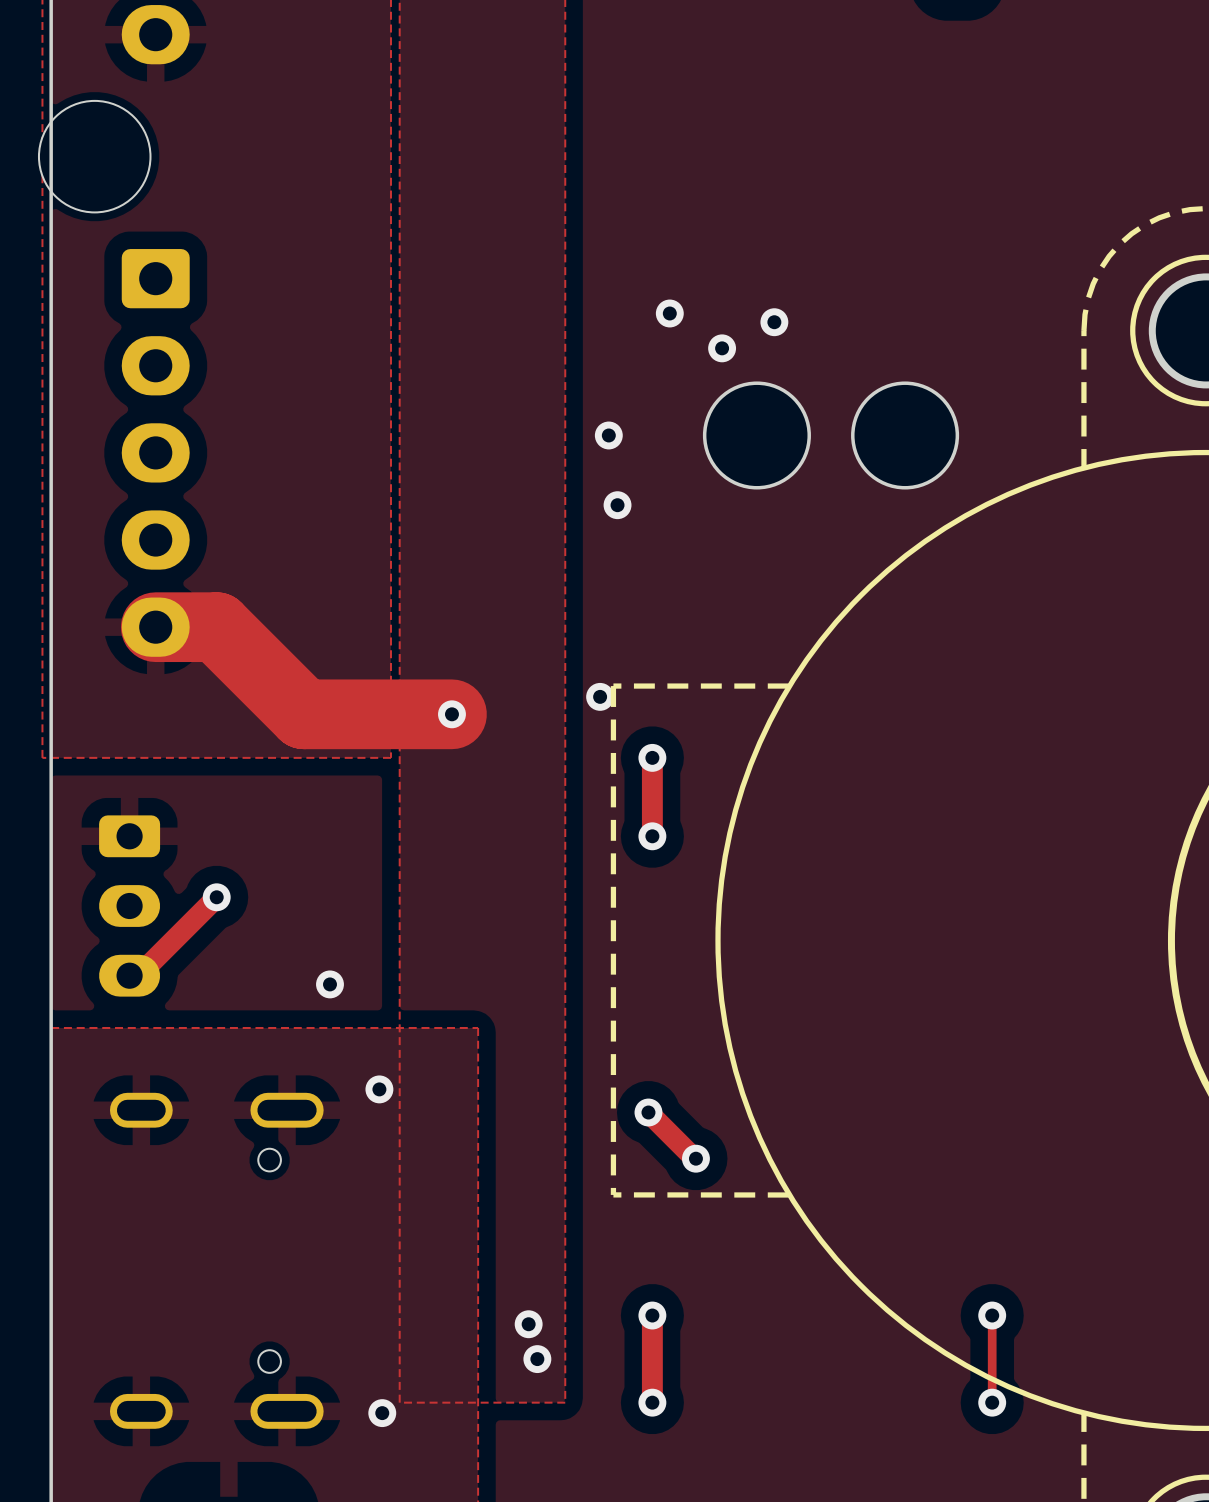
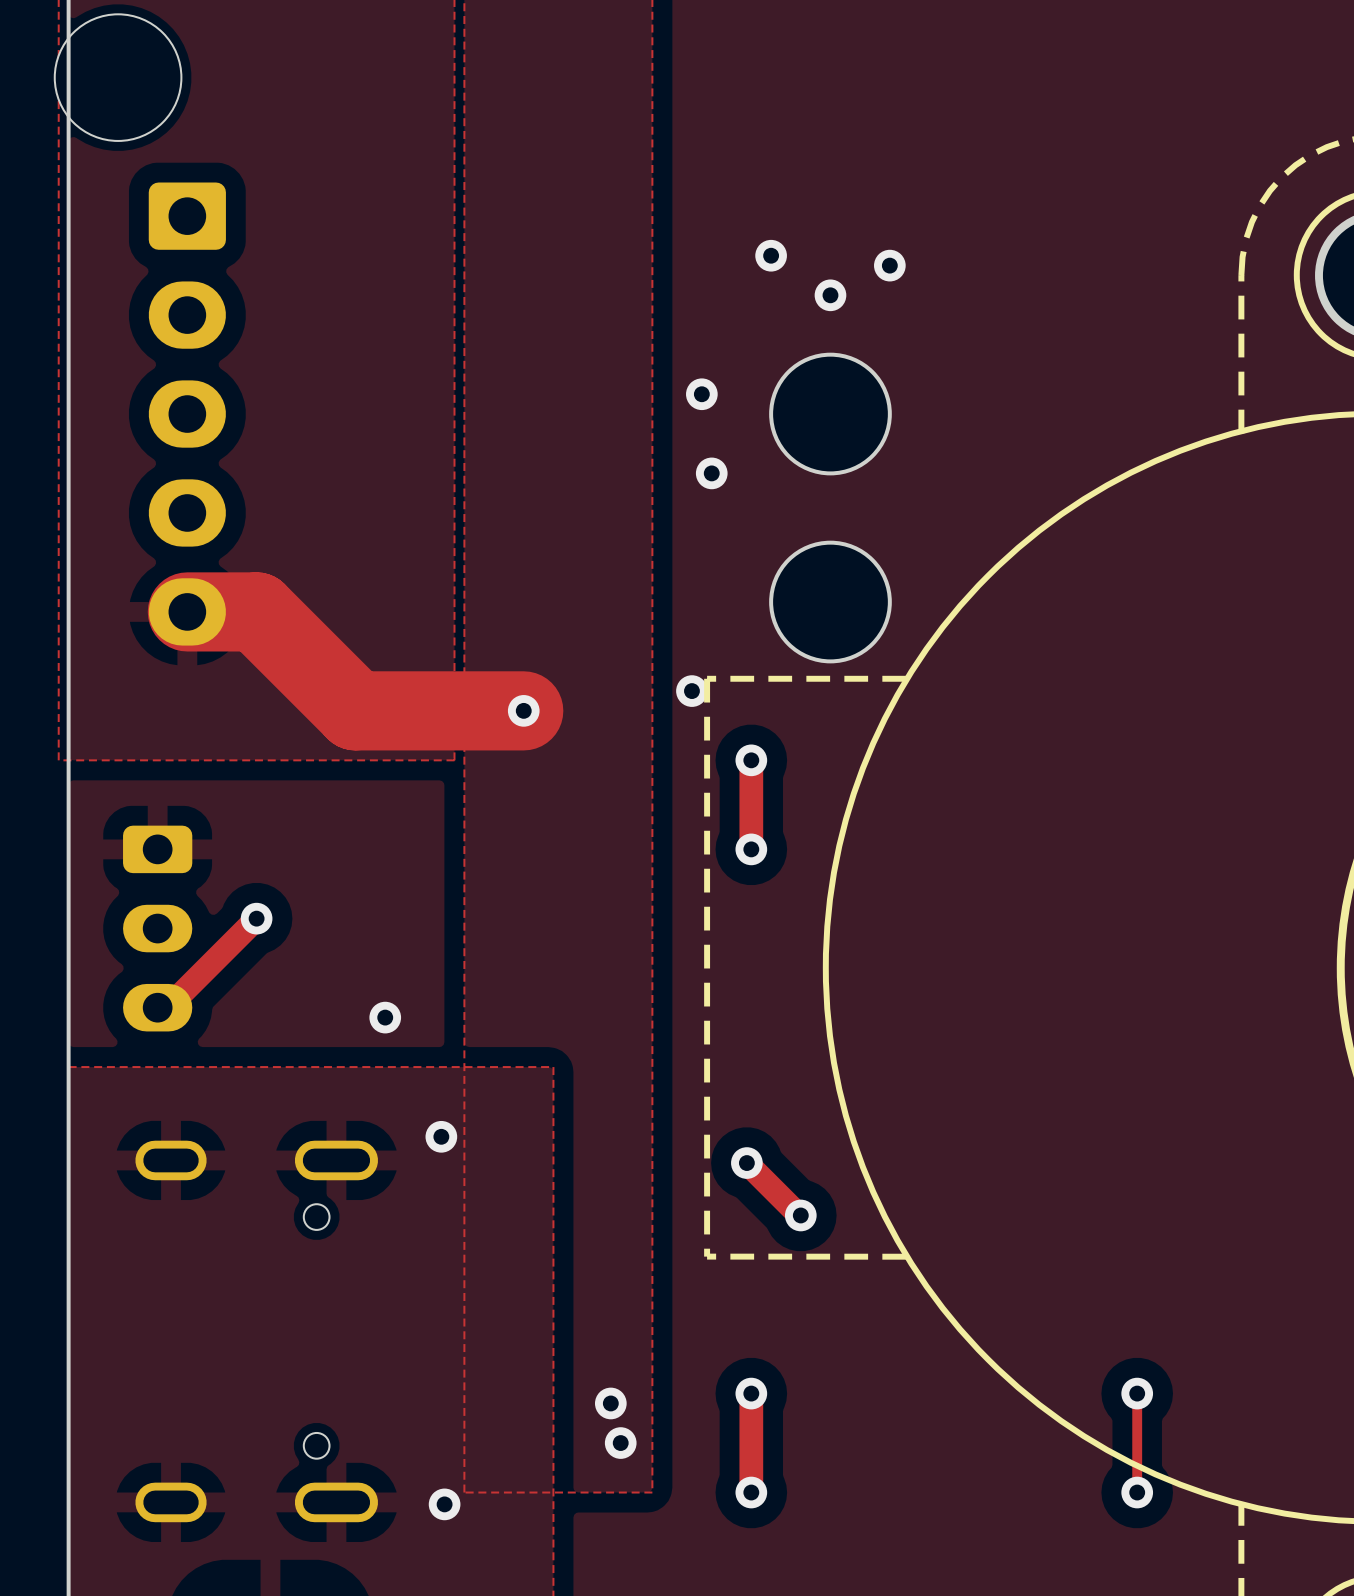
round board edge: [851, 381, 960, 490] -> none
round board edge position: (756, 435) -> (830, 414)
round board edge: none -> [769, 540, 892, 664]

